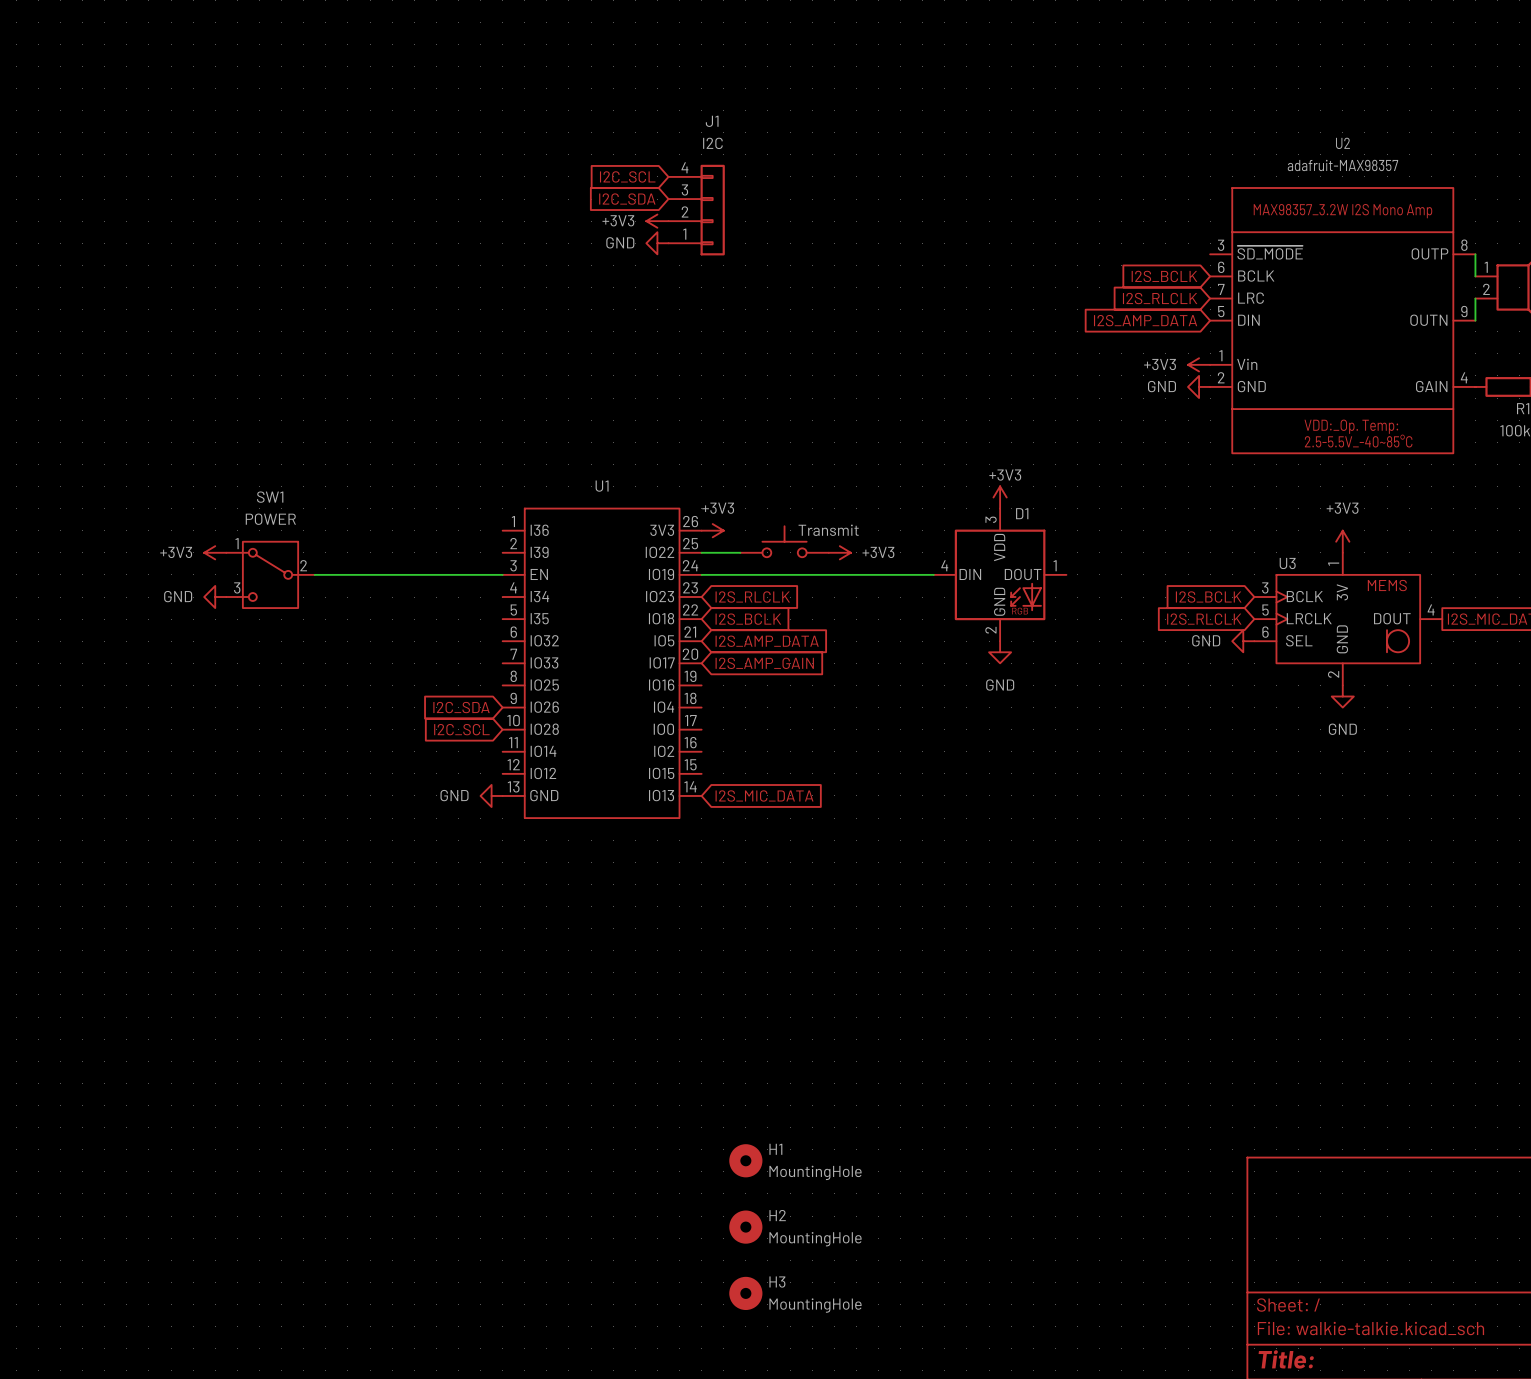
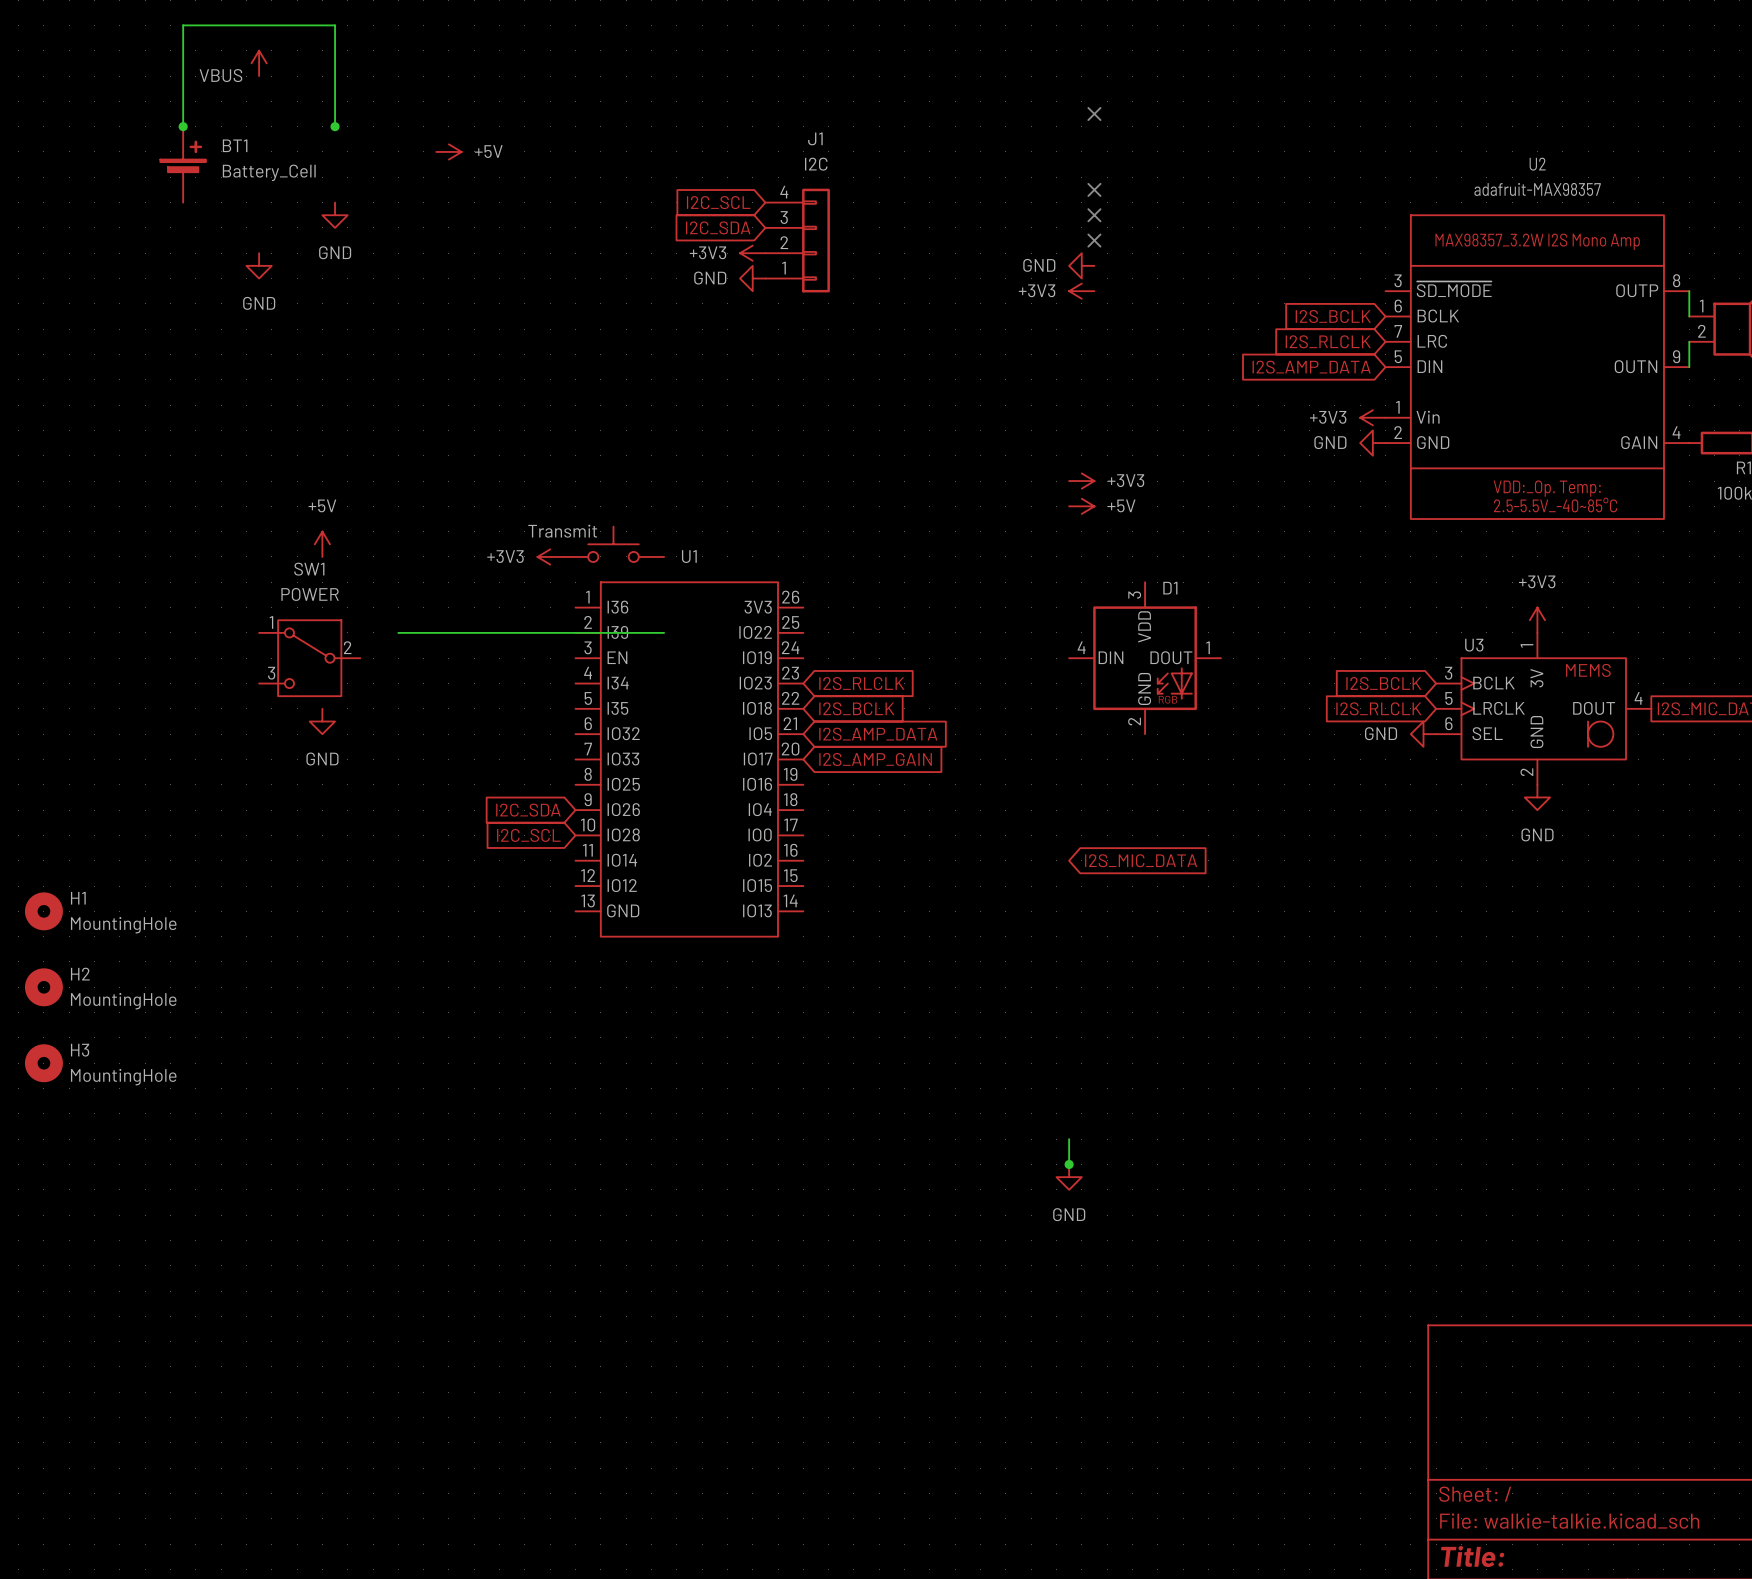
power symbol: none -> VBUS (259, 63)
no-connect mark: none -> (1094, 113)
wire: none -> (183, 126) (183, 25) (335, 25) (335, 126)
junction: none -> (183, 126)
junction: none -> (335, 126)
power symbol: none -> +5V (448, 151)
BT1: none -> Battery_Cell (183, 164)
no-connect mark: none -> (1094, 189)
power symbol: none -> GND (335, 215)
no-connect mark: none -> (1094, 215)
no-connect mark: none -> (1094, 240)
power symbol: none -> GND (259, 265)
power symbol: none -> GND (1081, 265)
power symbol: none -> +3V3 (1081, 291)
power symbol: none -> +3V3 (1081, 481)
power symbol: none -> +5V (1081, 506)
power symbol: none -> +5V (322, 544)
part: none -> Transmit (613, 544)
power symbol: none -> +3V3 (550, 556)
power symbol: +3V3 (1000, 497) -> none
power symbol: +3V3 (712, 530) -> none
part: Transmit (784, 541) -> none
power symbol: +3V3 (215, 552) -> none
wire: none -> (398, 632) (664, 632)
wire: (701, 552) (740, 552) -> none
power symbol: +3V3 (839, 552) -> none
wire: (314, 574) (502, 574) -> none
wire: (701, 574) (933, 574) -> none
power symbol rotation: 0° (215, 597) -> 90° counterclockwise (322, 721)
power symbol position: GND (215, 597) -> GND (322, 721)
power symbol: GND (1000, 652) -> none
global label: none -> I2S_MIC_DATA (1141, 860)
power symbol: GND (491, 795) -> none
global label: I2S_MIC_DATA (764, 795) -> none
wire: none -> (1069, 1139) (1069, 1164)
junction: none -> (1069, 1164)
power symbol: none -> GND (1069, 1177)
H1 position: (745, 1160) -> (43, 911)
H2 position: (745, 1227) -> (43, 987)
H3 position: (745, 1293) -> (43, 1063)

